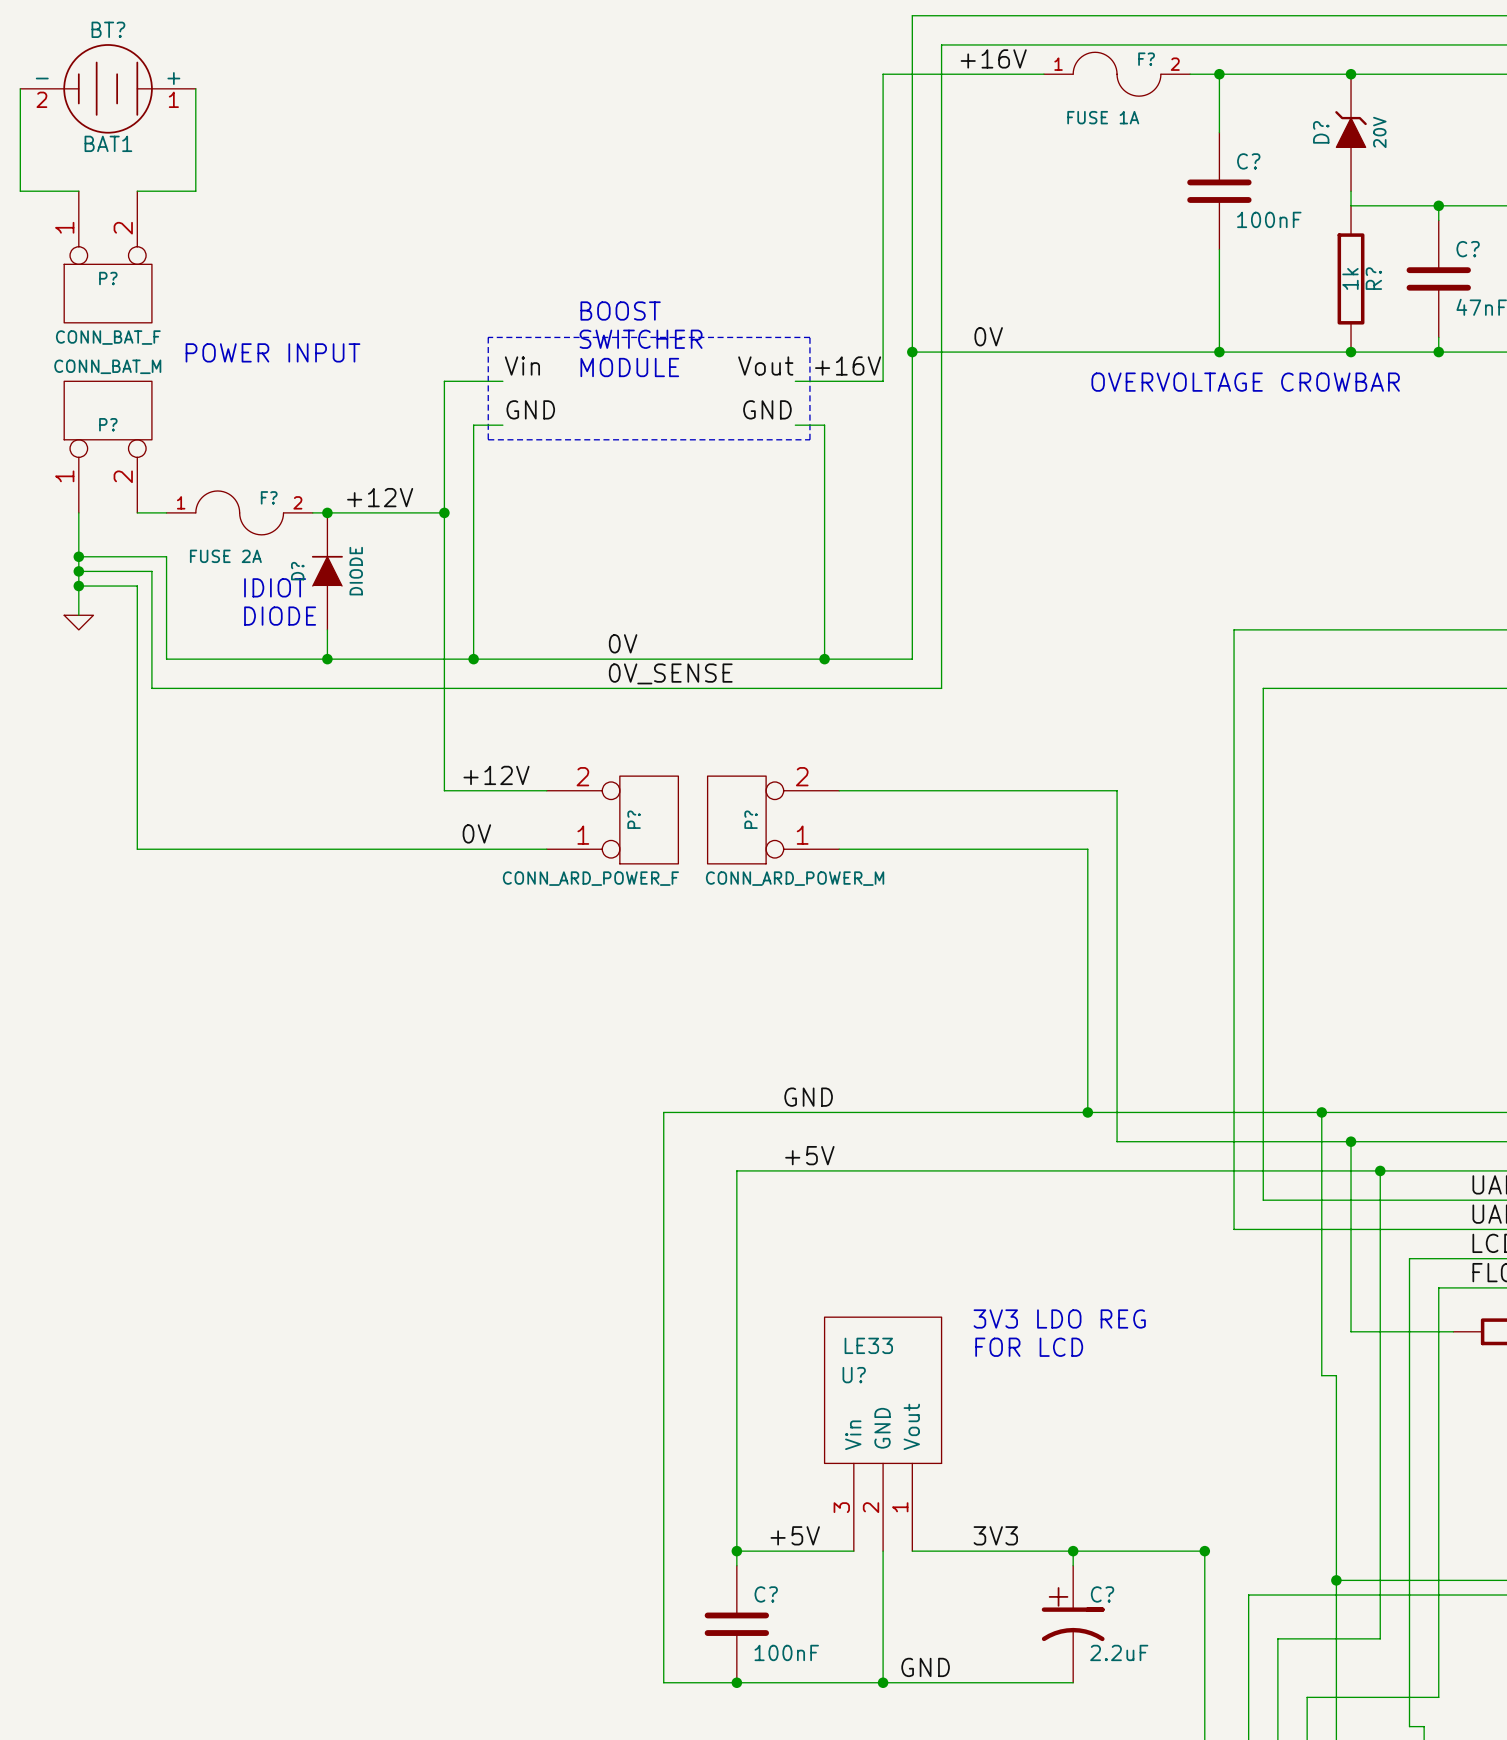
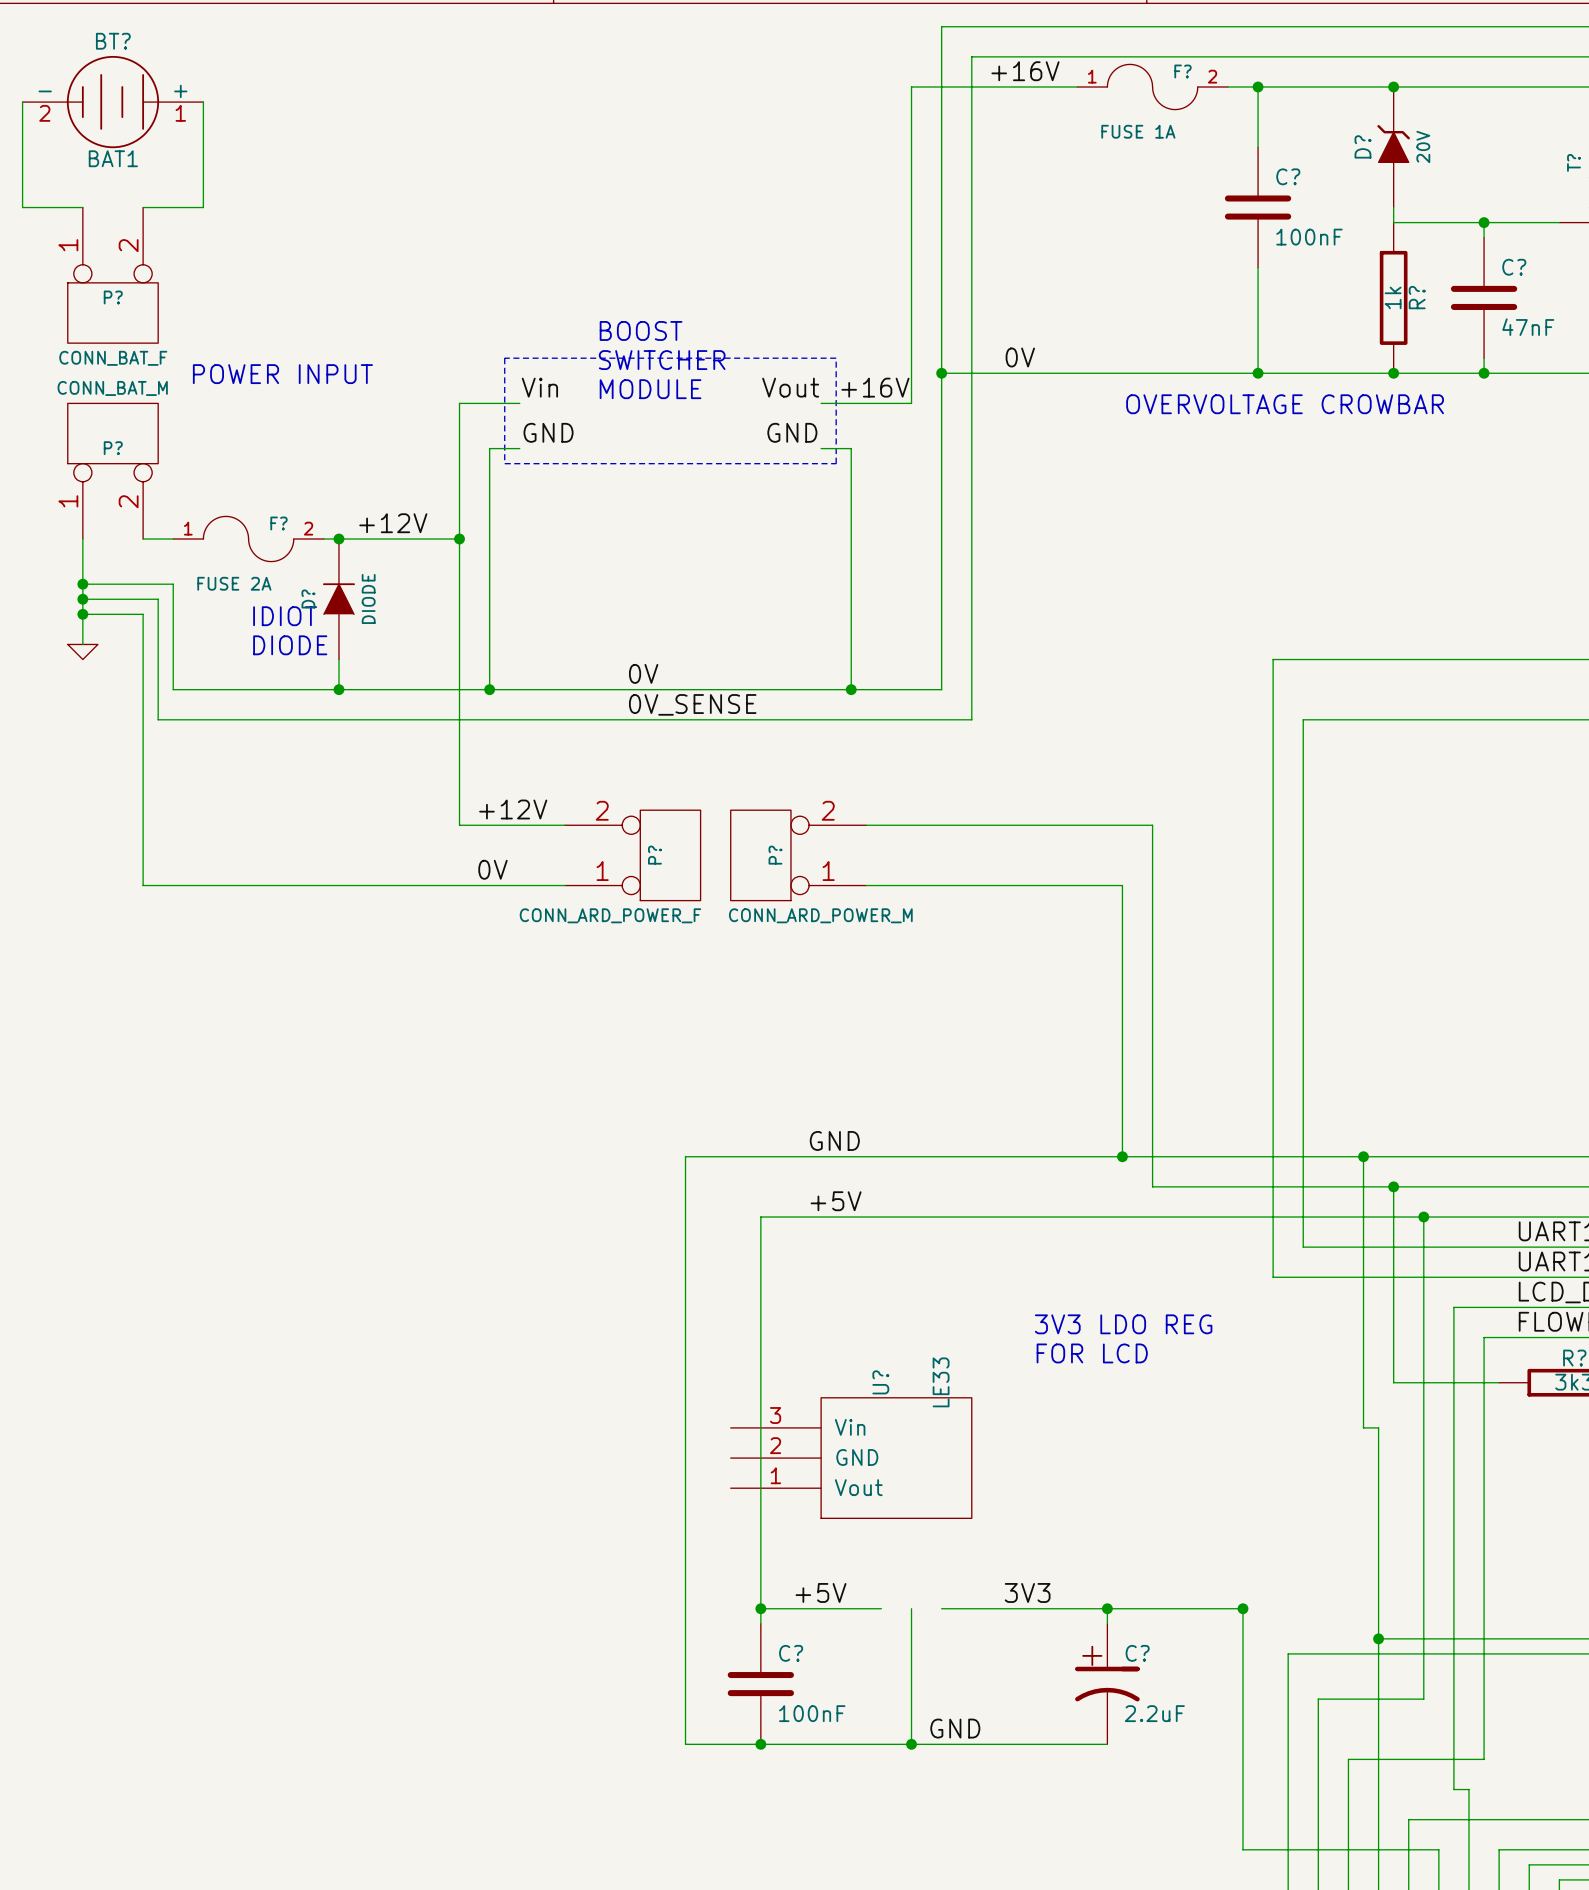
text position: 3V3 LDO REG (1059, 1318) -> 3V3 LDO REG (1123, 1324)
U? value position: LE33 (868, 1345) -> LE33 (941, 1382)
text position: FOR LCD (1029, 1347) -> FOR LCD (1092, 1353)
U? name position: U? (854, 1375) -> U? (880, 1382)
U? rotation: 0° (883, 1390) -> 90° clockwise (896, 1458)

